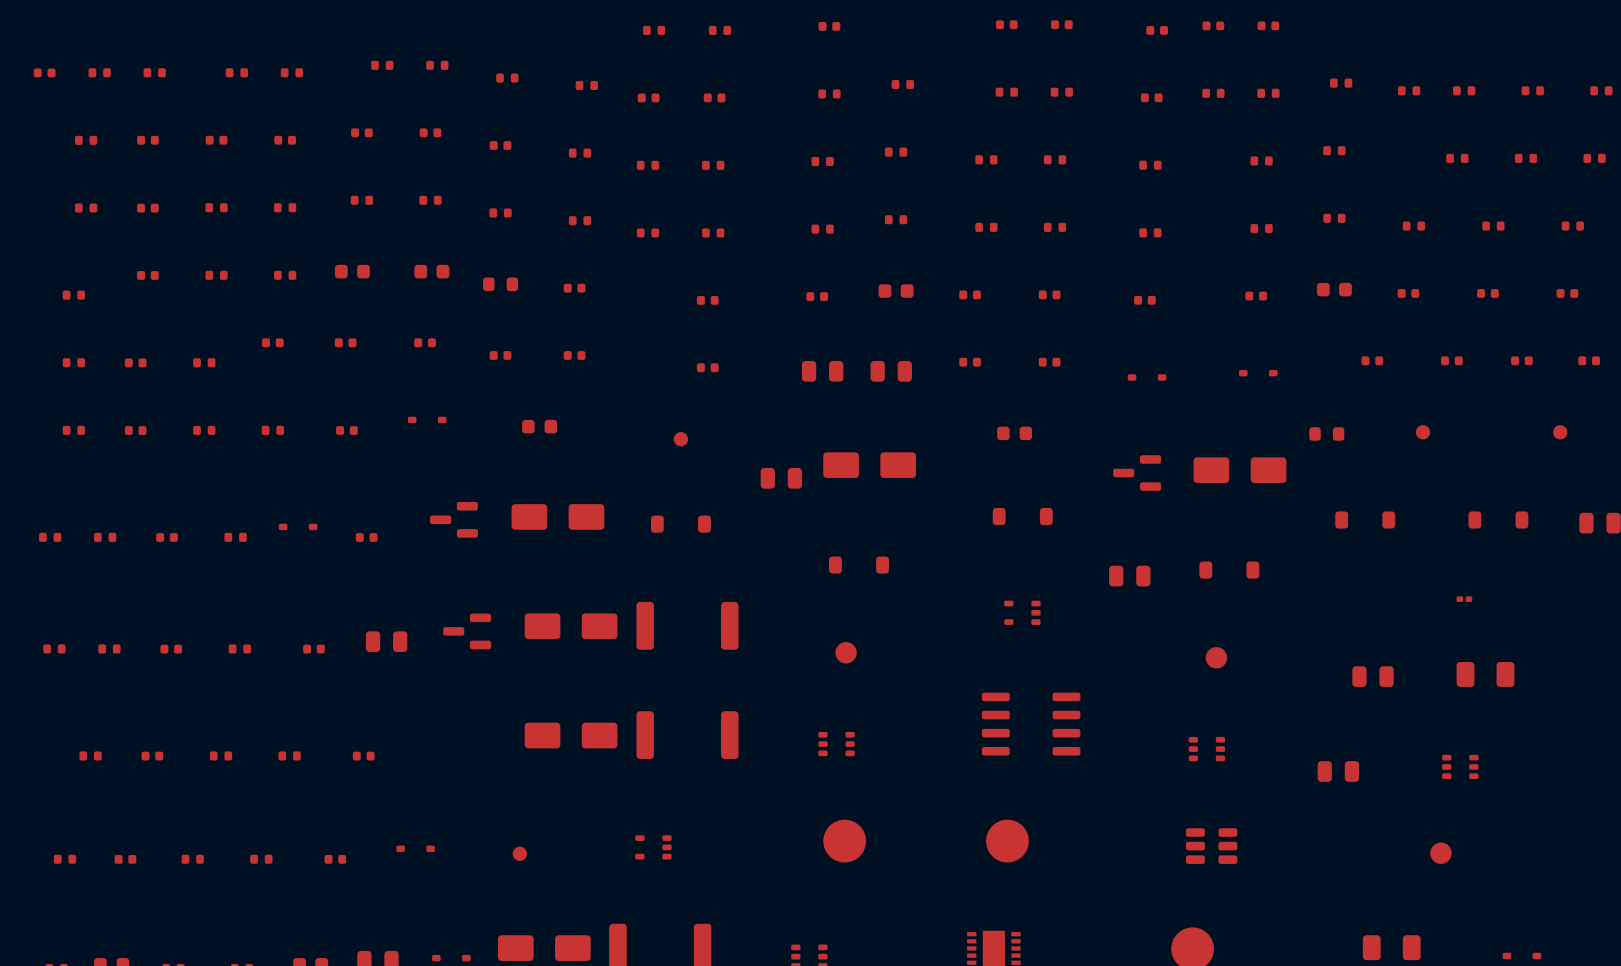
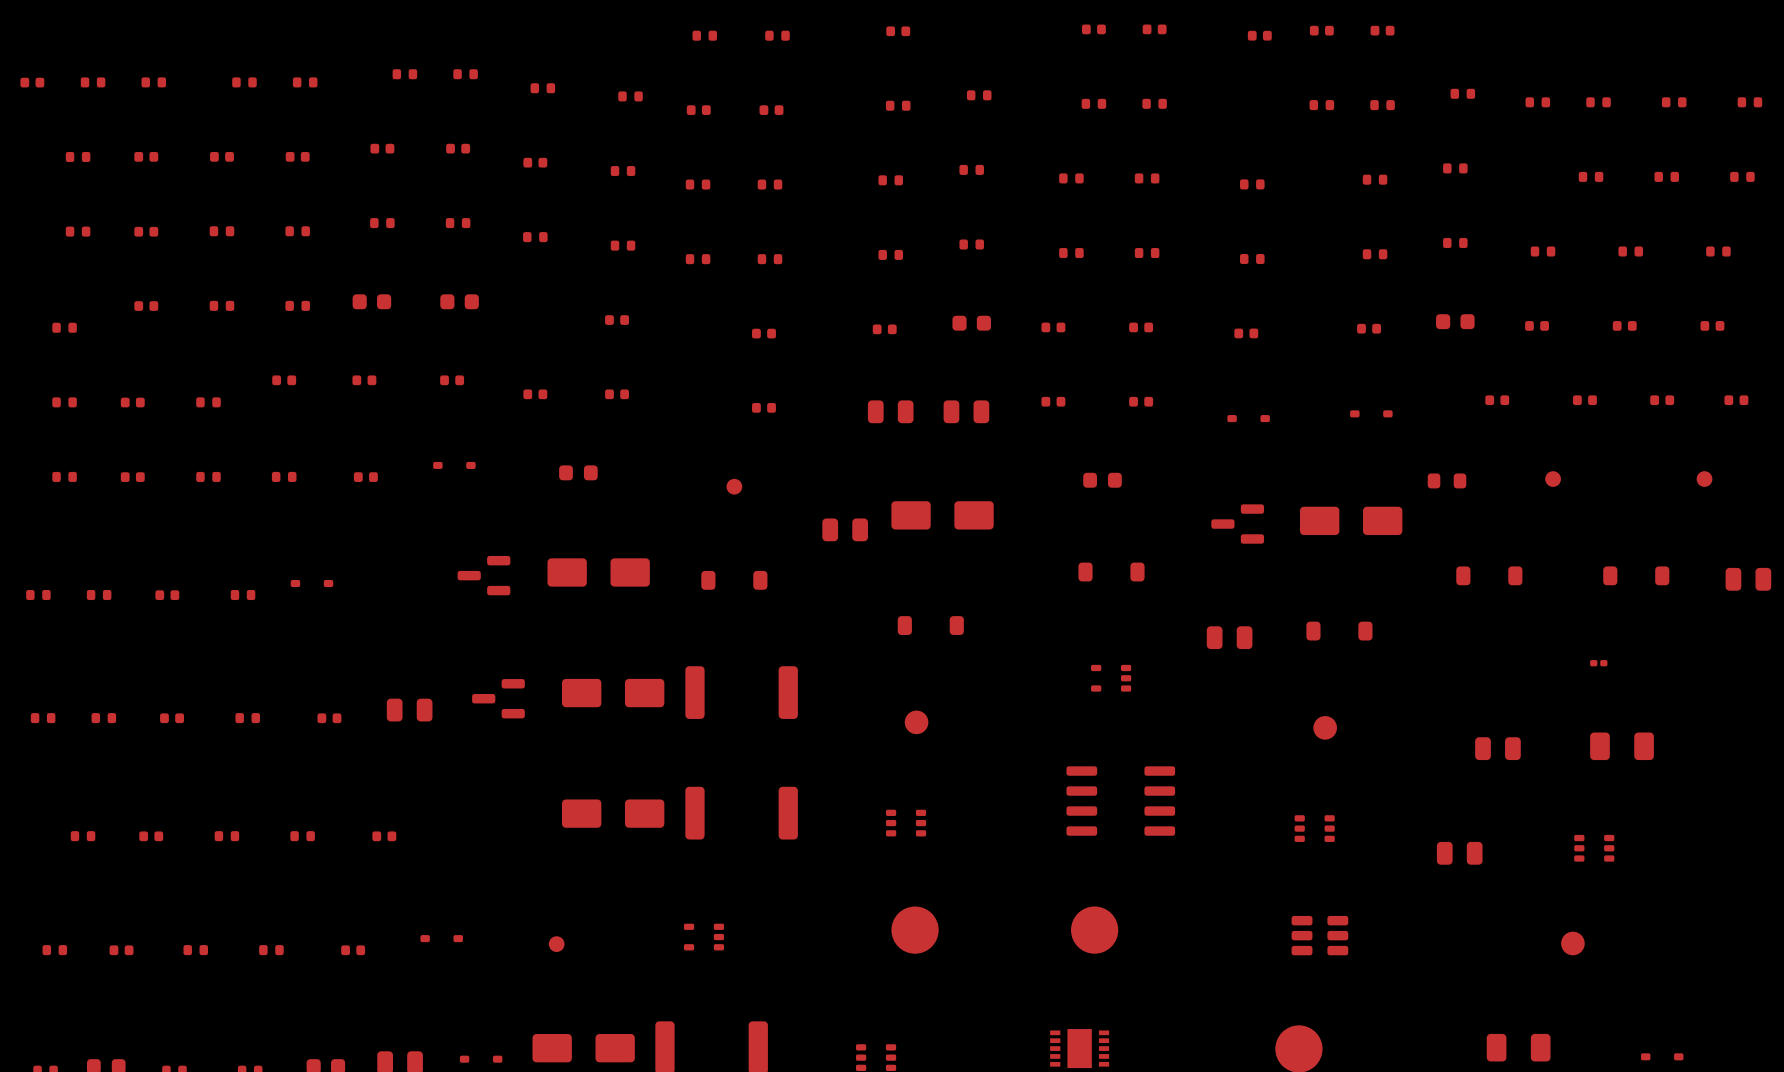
part: (1151, 97) -> none
part: (500, 284) -> none
part: (366, 537) -> none

